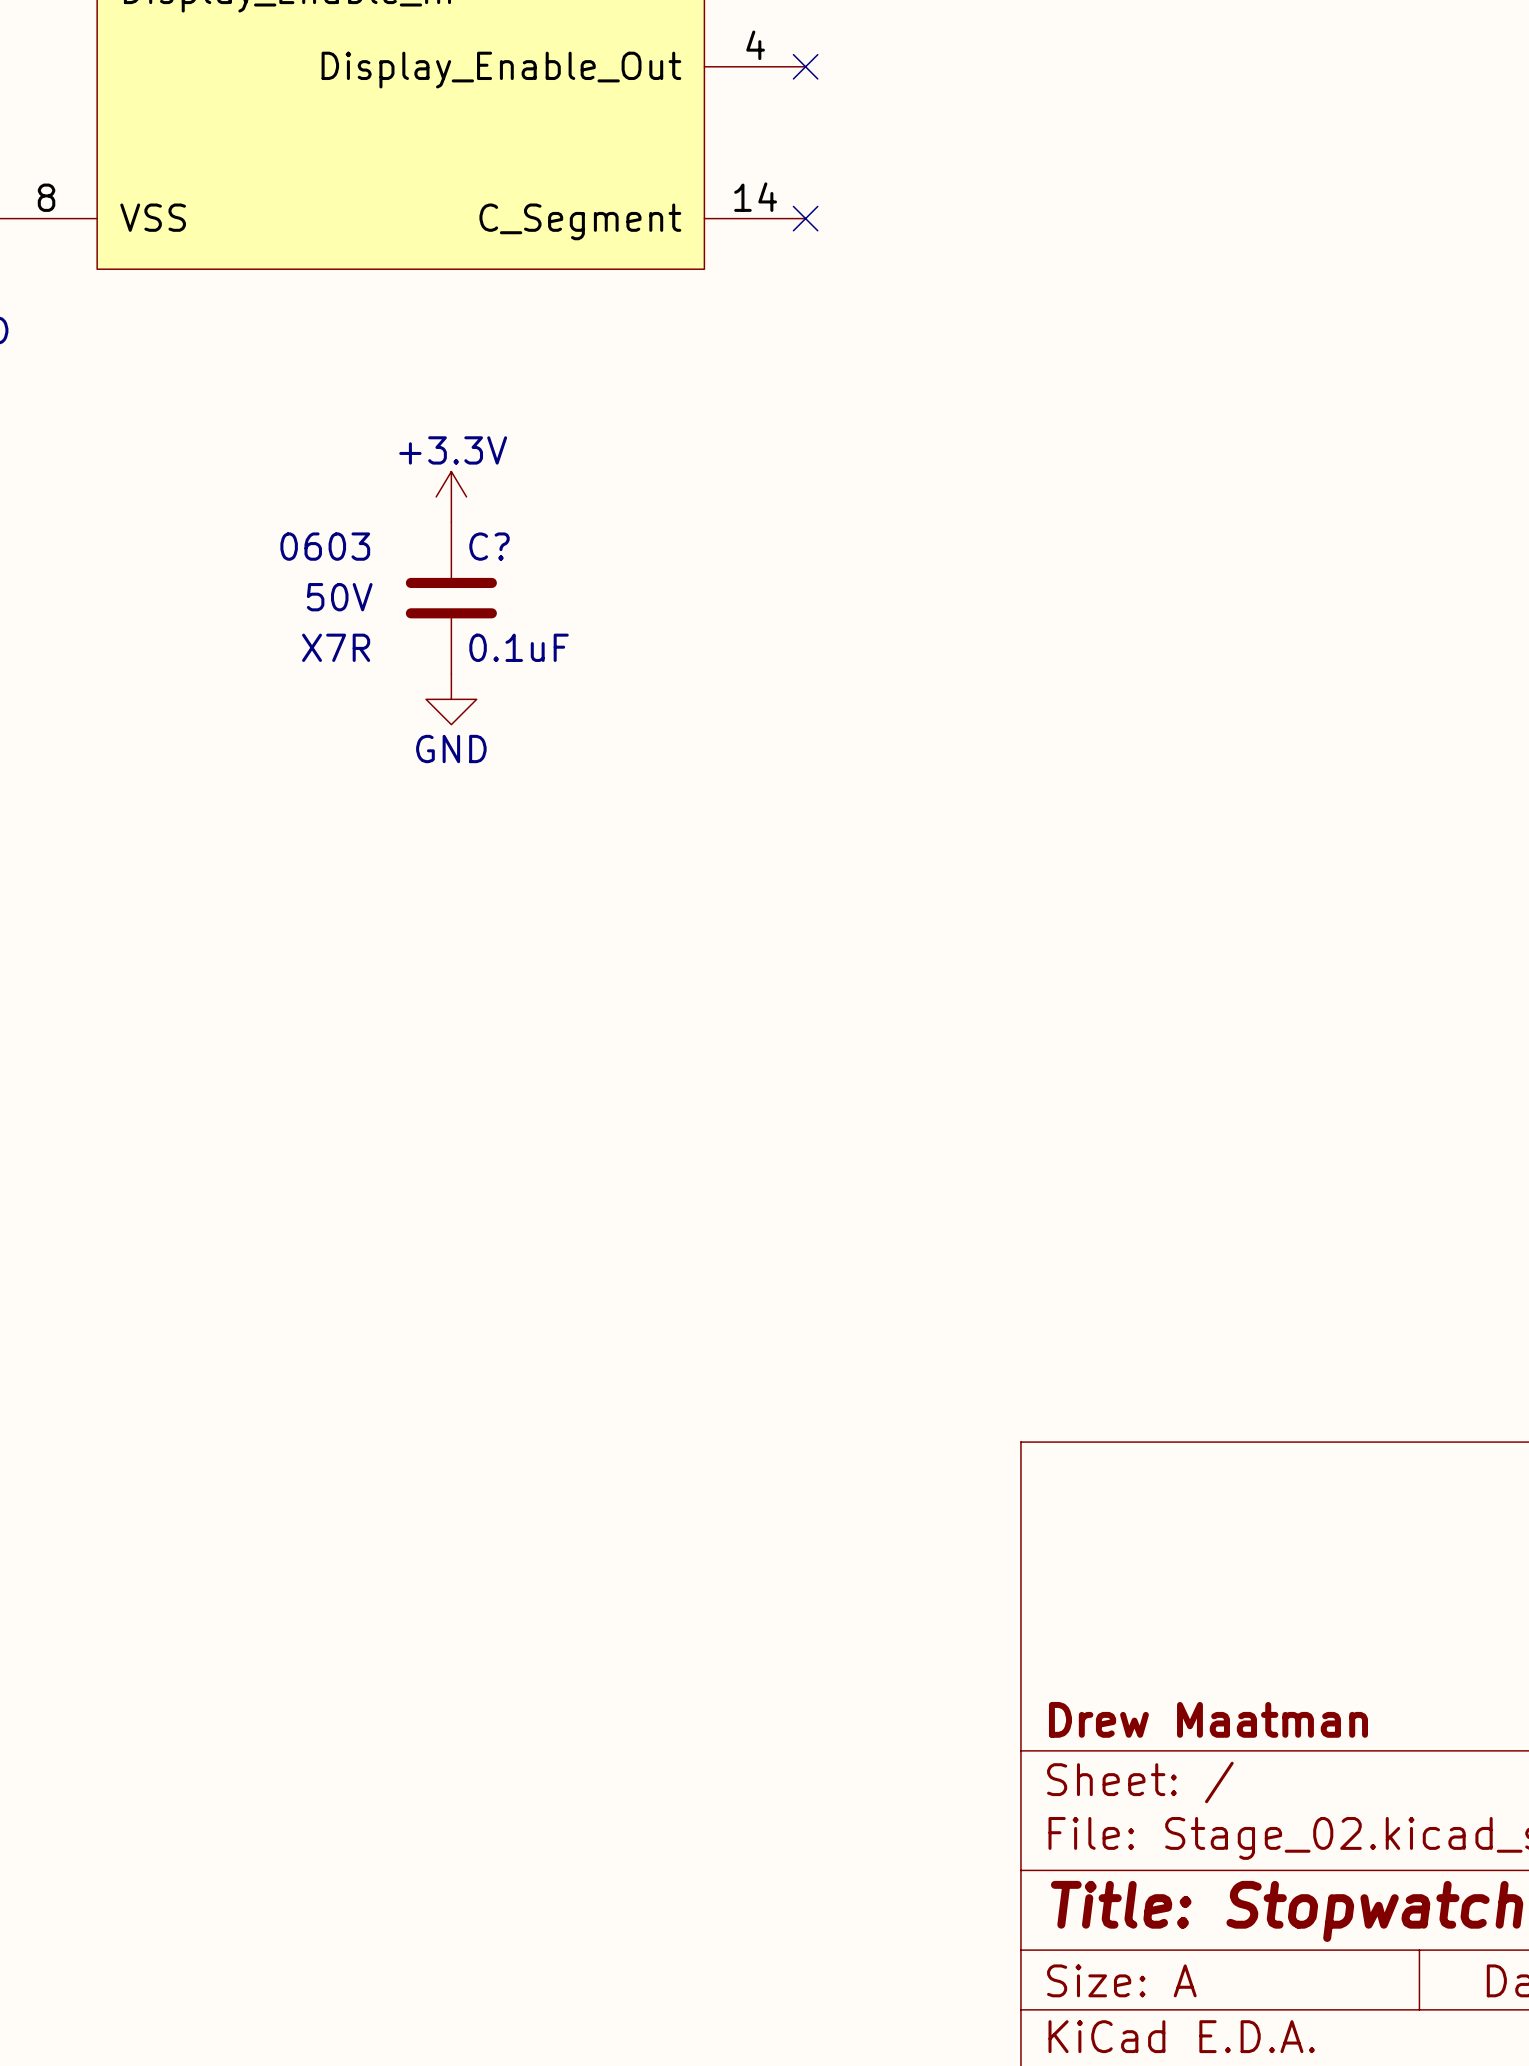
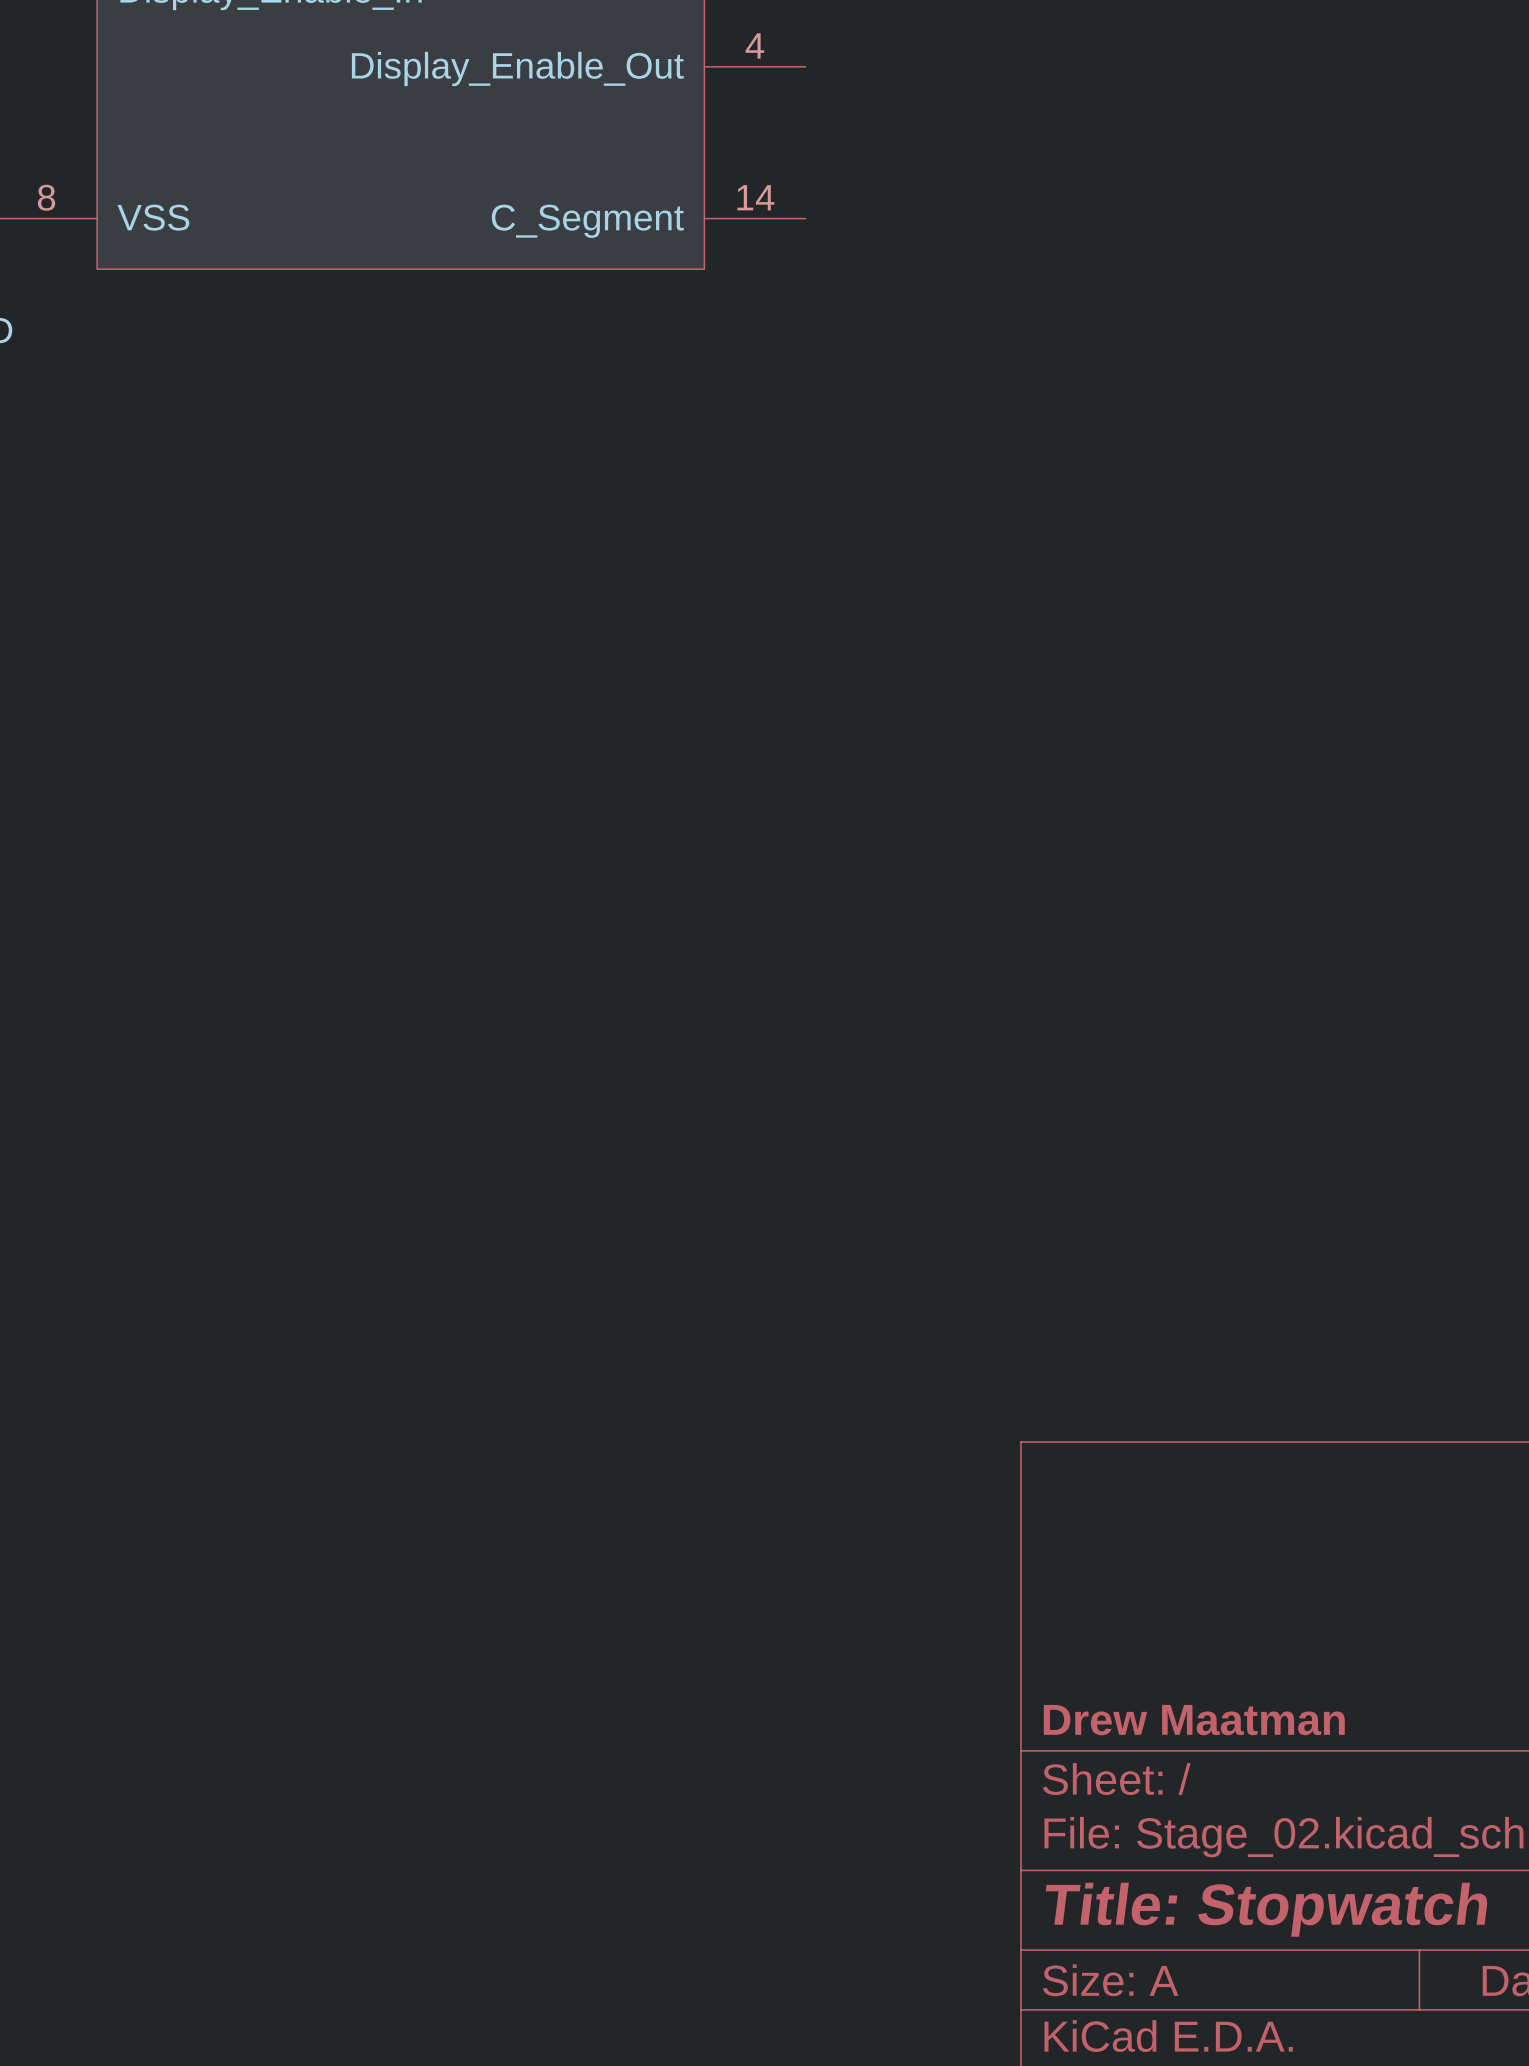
no-connect mark: (805, 66) -> none
no-connect mark: (805, 218) -> none
power symbol: +3.3V (451, 496) -> none
C?: 0.1uF (451, 598) -> none
power symbol: GND (451, 699) -> none

